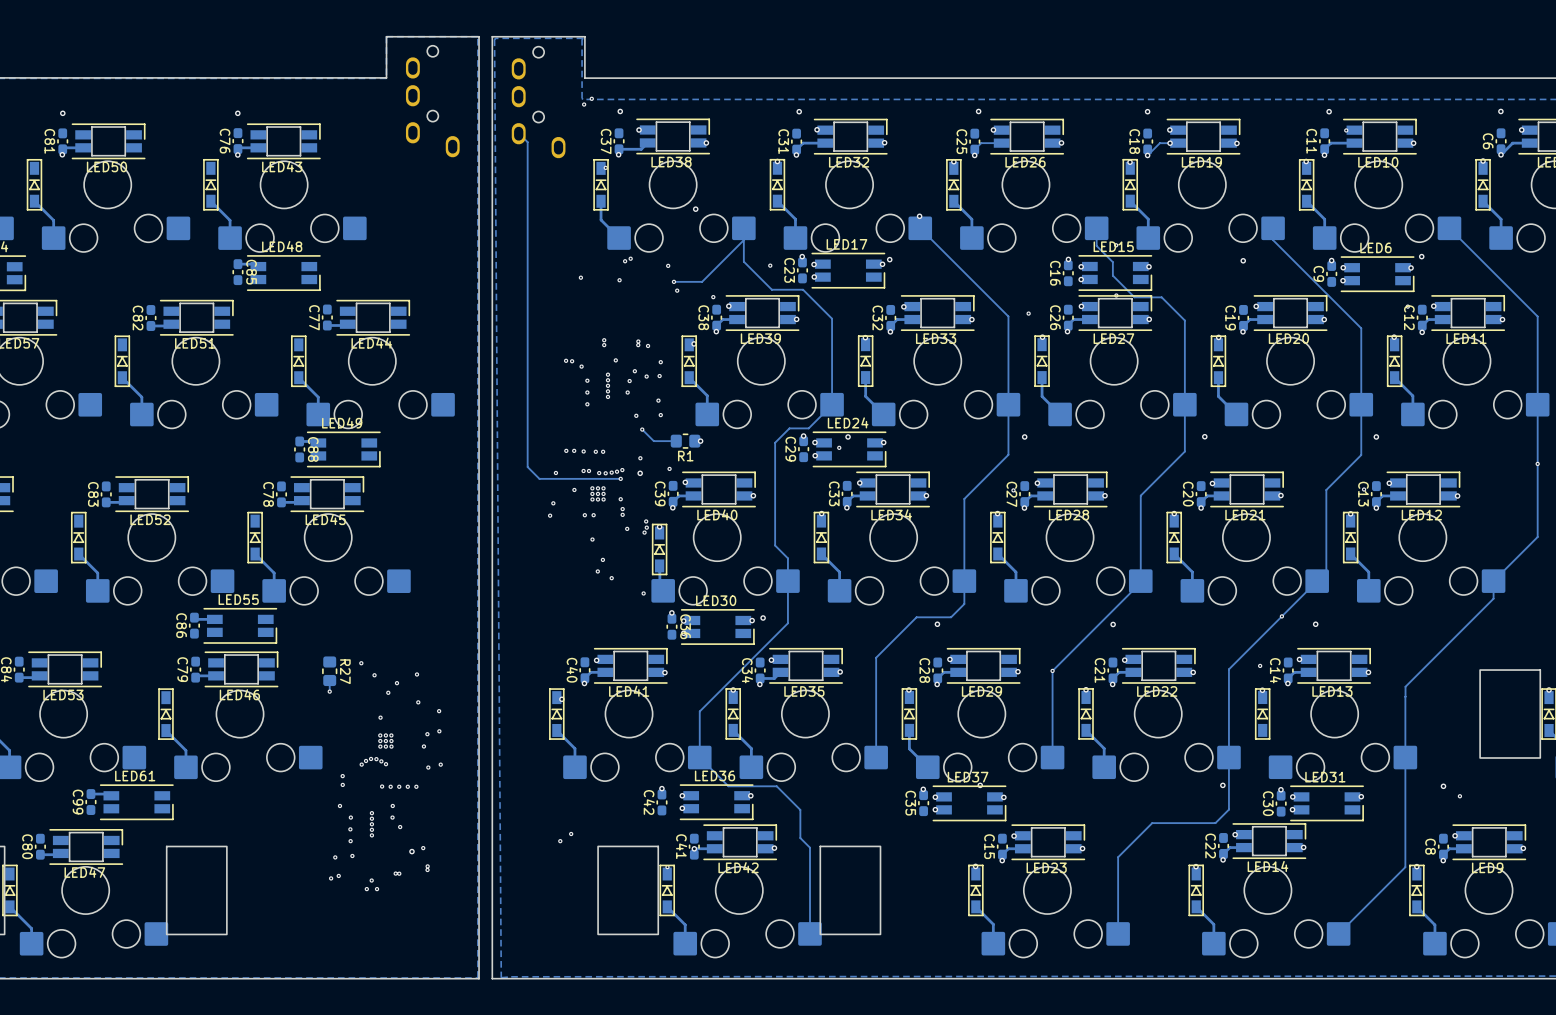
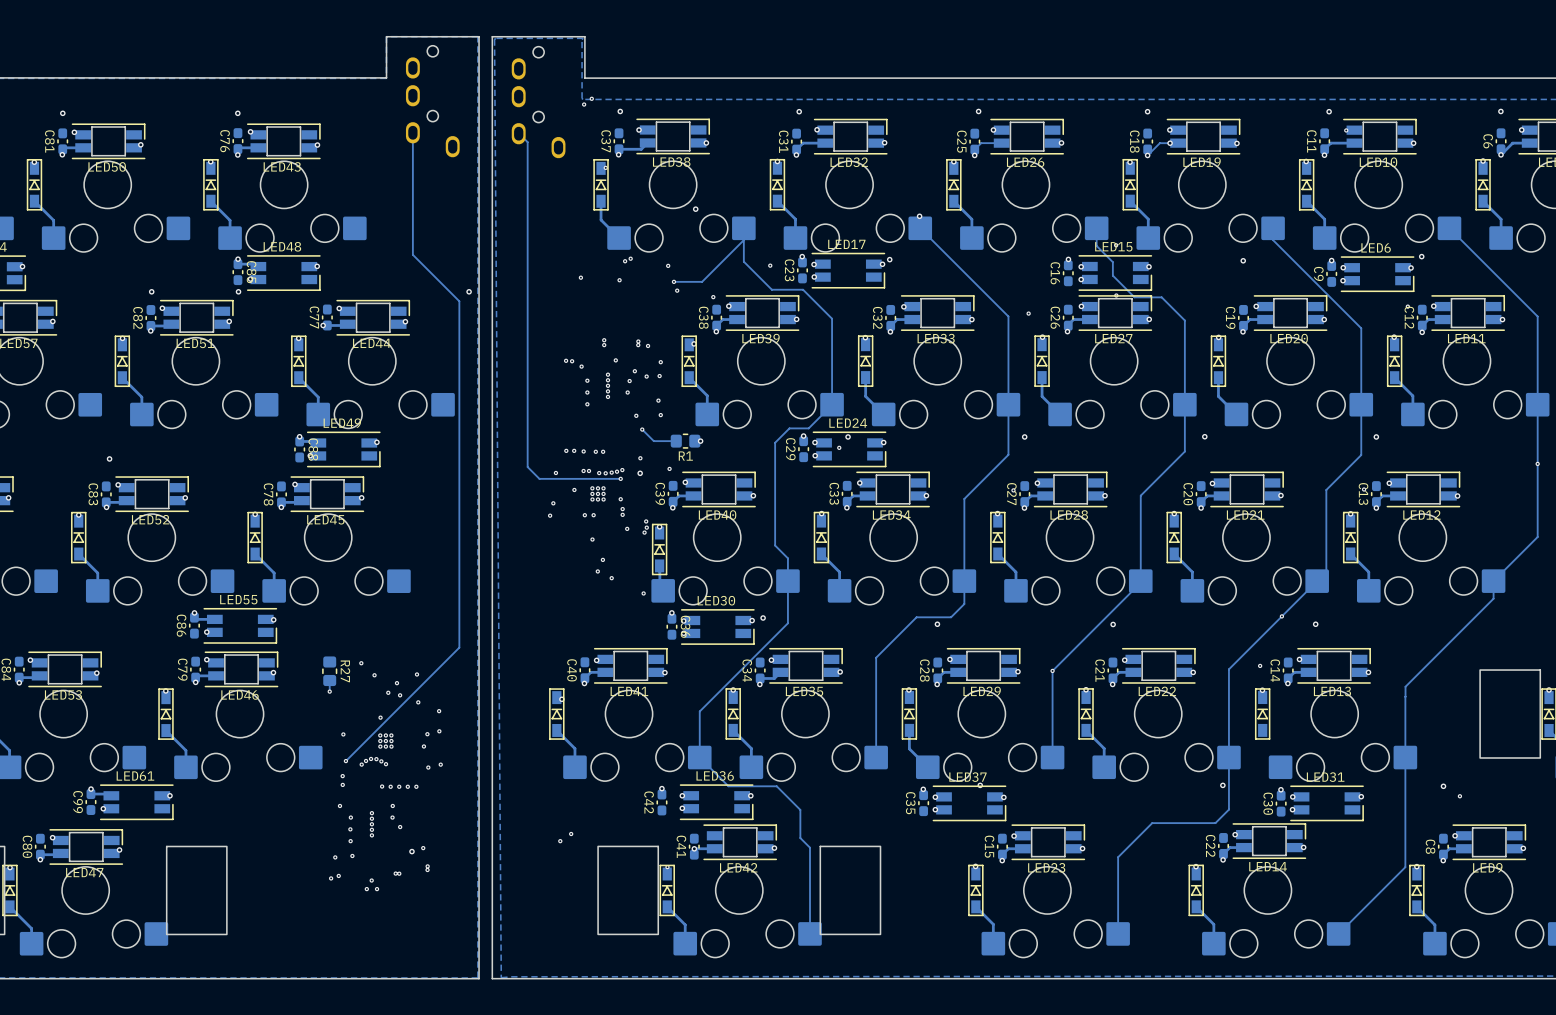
via: none -> (250, 131)
via: none -> (74, 132)
track: none -> (412, 132) (412, 254) (459, 301) (459, 647) (345, 761)
via: none -> (140, 144)
via: none -> (317, 145)
via: none -> (210, 161)
via: none -> (34, 162)
via: none -> (238, 259)
via: none -> (22, 266)
via: none -> (317, 266)
via: none -> (250, 279)
via: none -> (151, 291)
via: none -> (238, 291)
via: none -> (469, 291)
via: none -> (162, 308)
via: none -> (339, 308)
via: none -> (52, 321)
via: none -> (229, 321)
via: none -> (405, 321)
via: none -> (323, 325)
via: none -> (150, 330)
via: none -> (122, 338)
via: none -> (298, 338)
via: none -> (299, 436)
via: none -> (376, 442)
via: none -> (310, 455)
via: none -> (109, 458)
via: none -> (118, 484)
via: none -> (295, 484)
via: none -> (8, 497)
via: none -> (185, 497)
via: none -> (361, 497)
via: none -> (106, 507)
via: none -> (281, 507)
via: none -> (78, 514)
via: none -> (255, 514)
via: none -> (194, 612)
via: none -> (273, 619)
via: none -> (206, 632)
via: none -> (206, 659)
via: none -> (30, 660)
via: none -> (273, 672)
via: none -> (96, 673)
via: none -> (19, 682)
via: none -> (195, 682)
via: none -> (165, 690)
via: none -> (400, 695)
via: none -> (343, 734)
via: none -> (345, 761)
via: none -> (91, 789)
via: none -> (169, 795)
via: none -> (103, 808)
via: none -> (52, 837)
via: none -> (119, 849)
via: none -> (40, 859)
via: none -> (10, 867)

